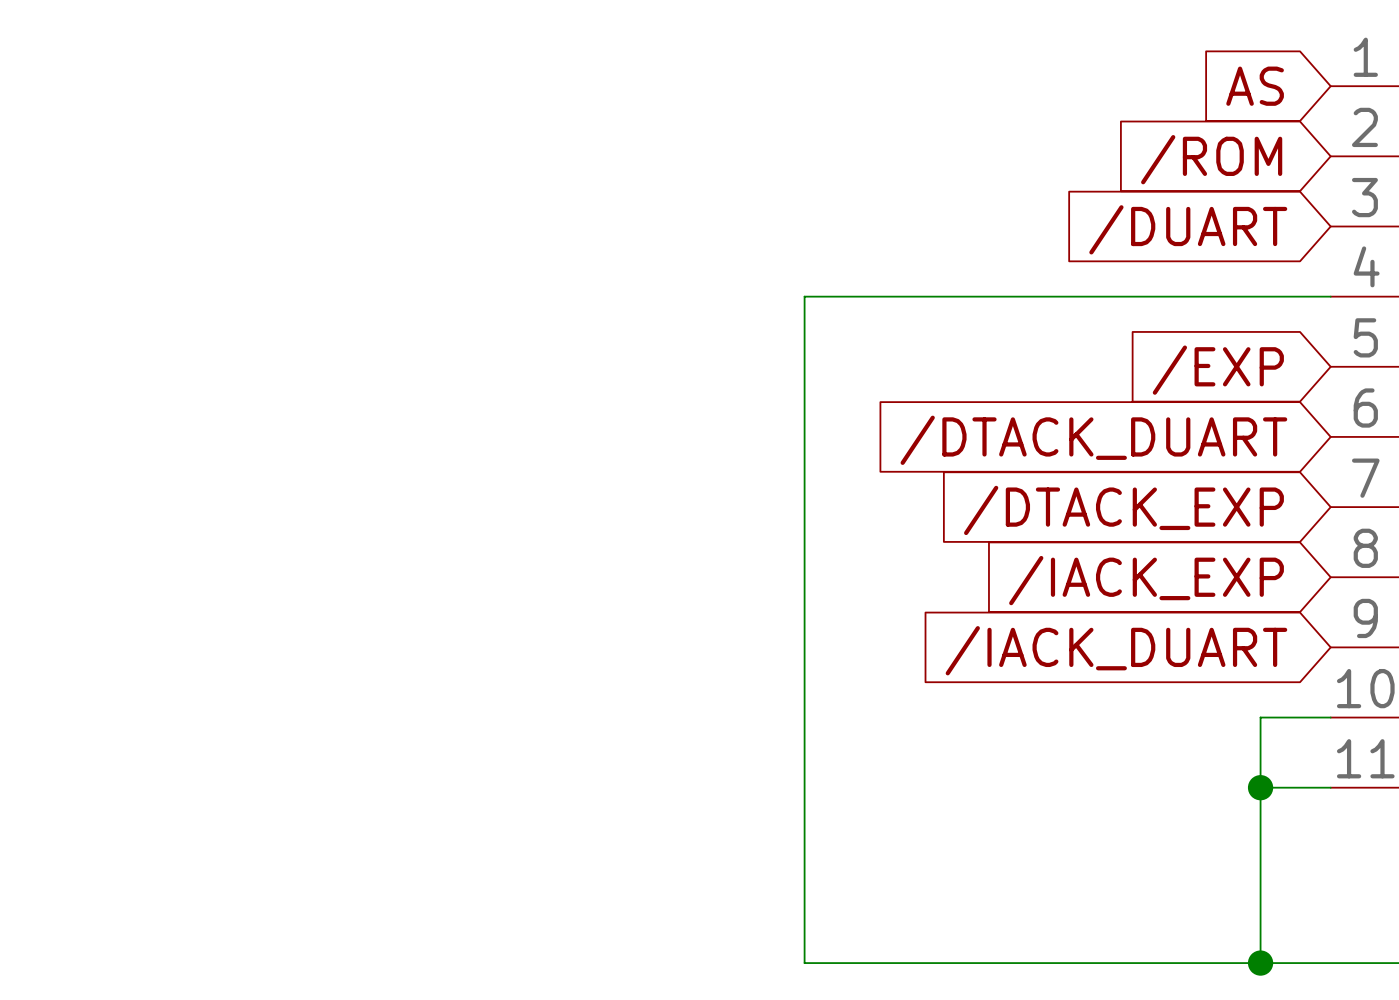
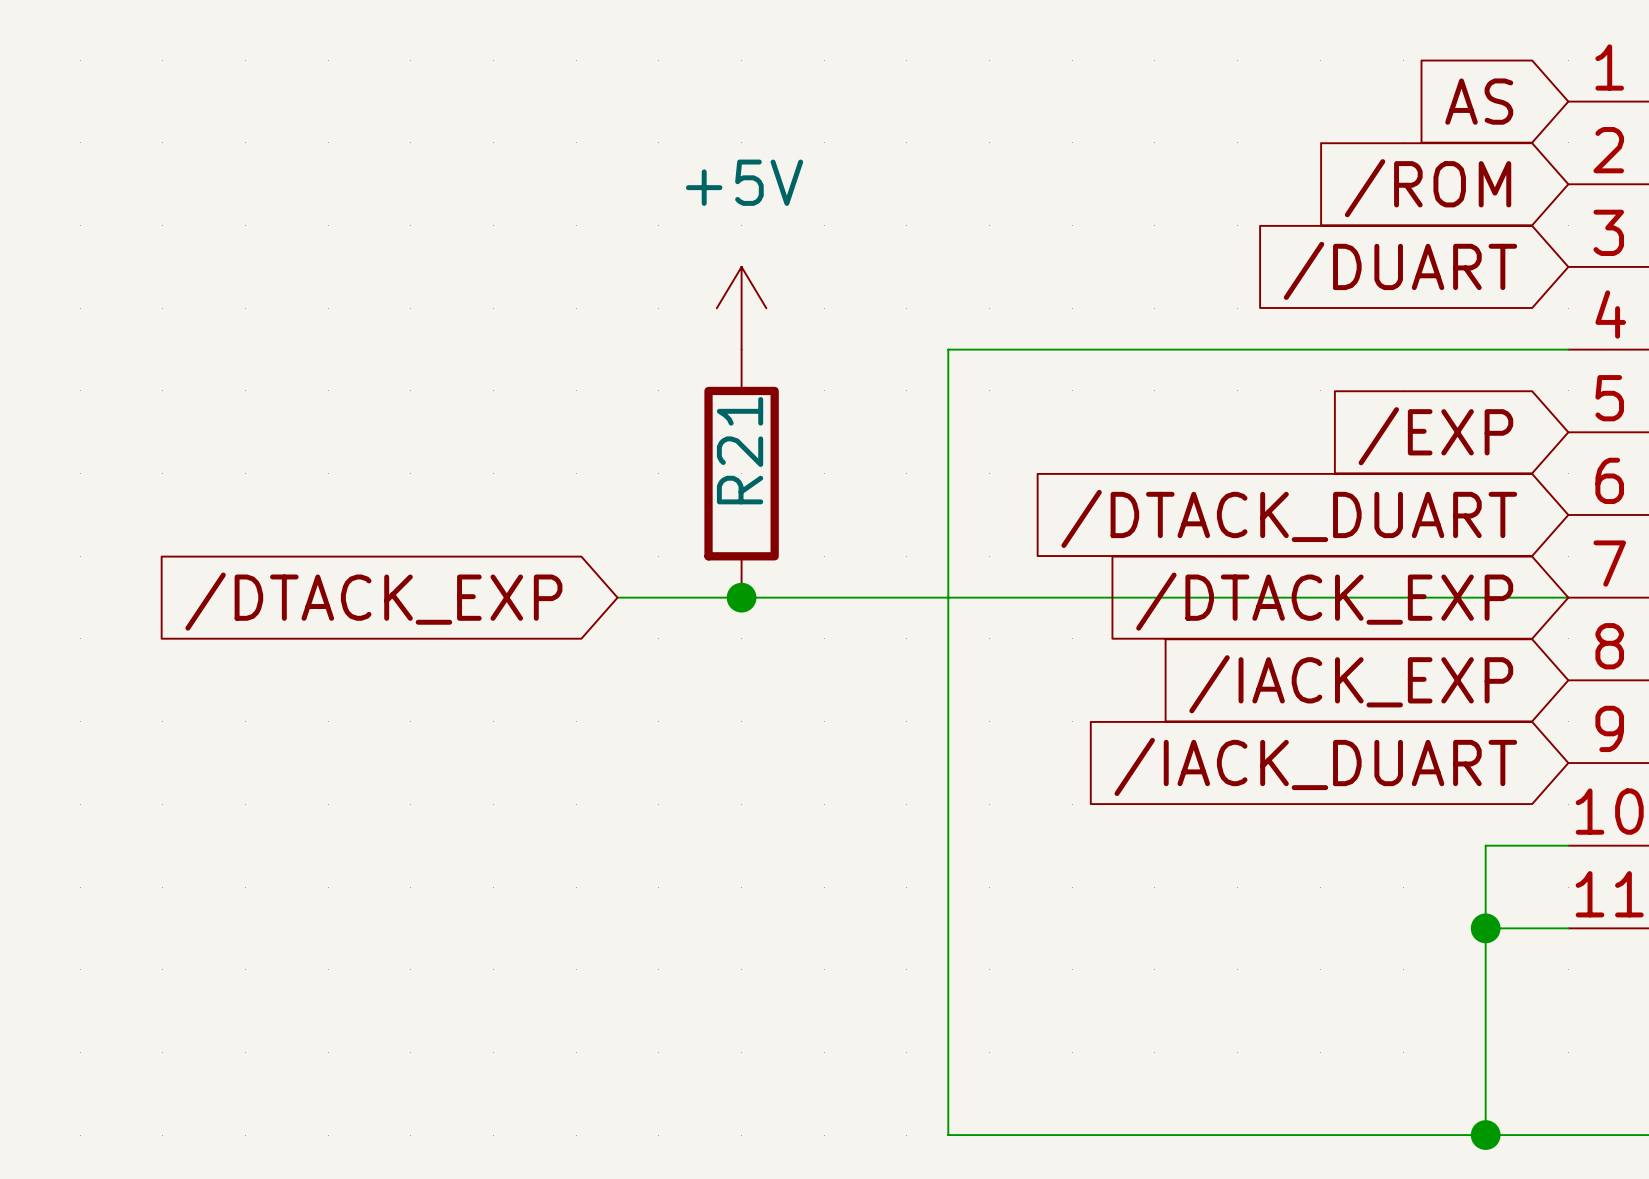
power symbol: none -> +5V (741, 308)
R21: none -> (741, 473)
wire: none -> (617, 597) (1568, 597)
junction: none -> (741, 597)
global label: none -> /DTACK_EXP (373, 601)

